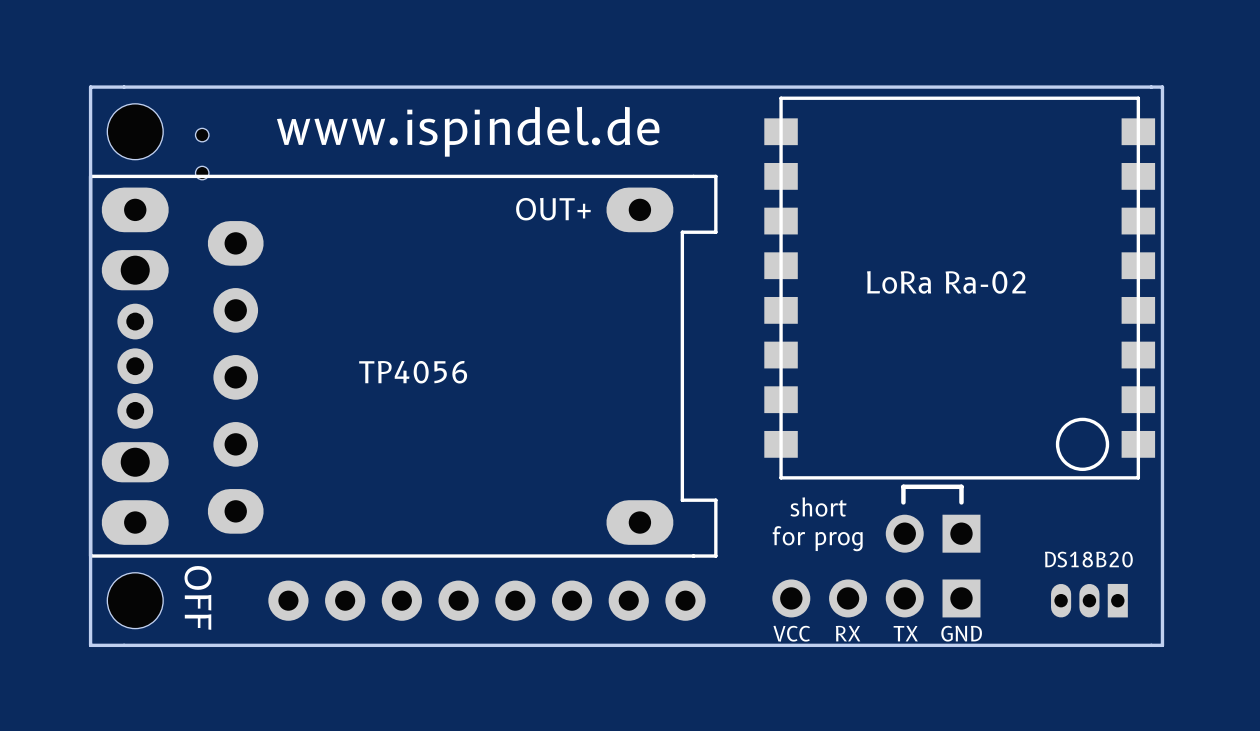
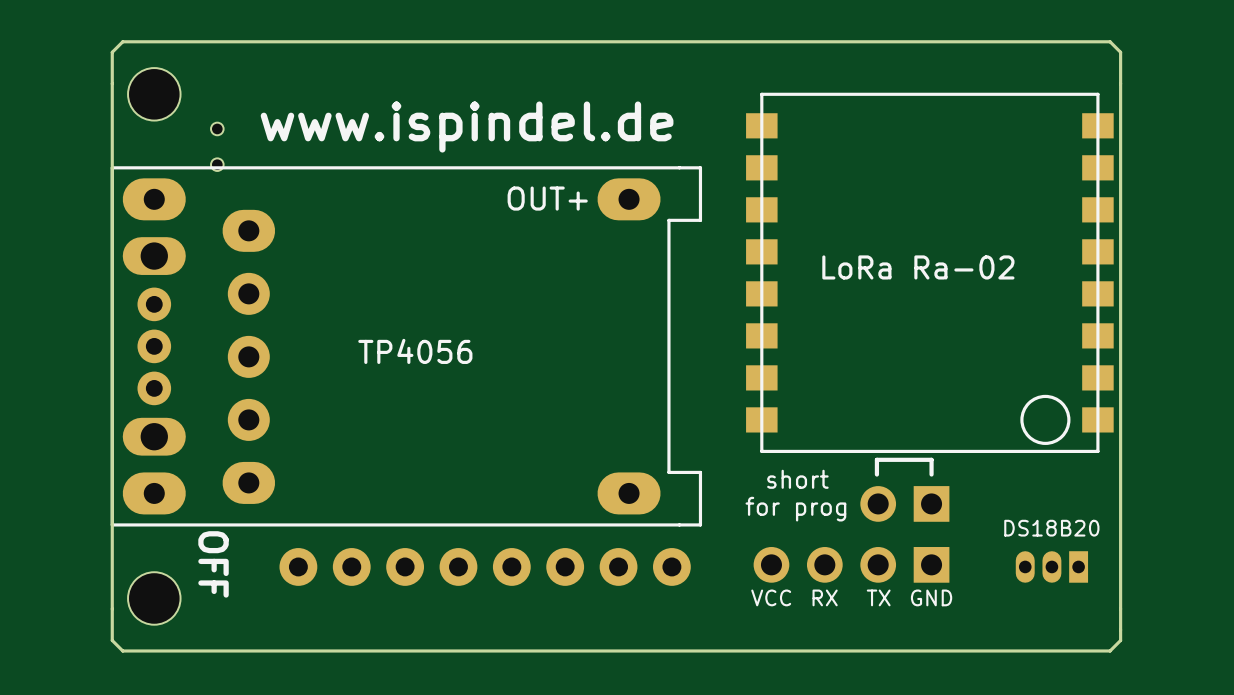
board edge: (1162, 87) (90, 87) -> (1120, 83) (1120, 52) (1110, 41) (122, 41) (112, 52) (112, 83)
part position: (135, 131) -> (154, 94)
part position: (135, 600) -> (154, 598)
board edge: (1162, 645) (90, 645) -> (1120, 608) (1120, 640) (1110, 650) (122, 650) (112, 640) (112, 608)

